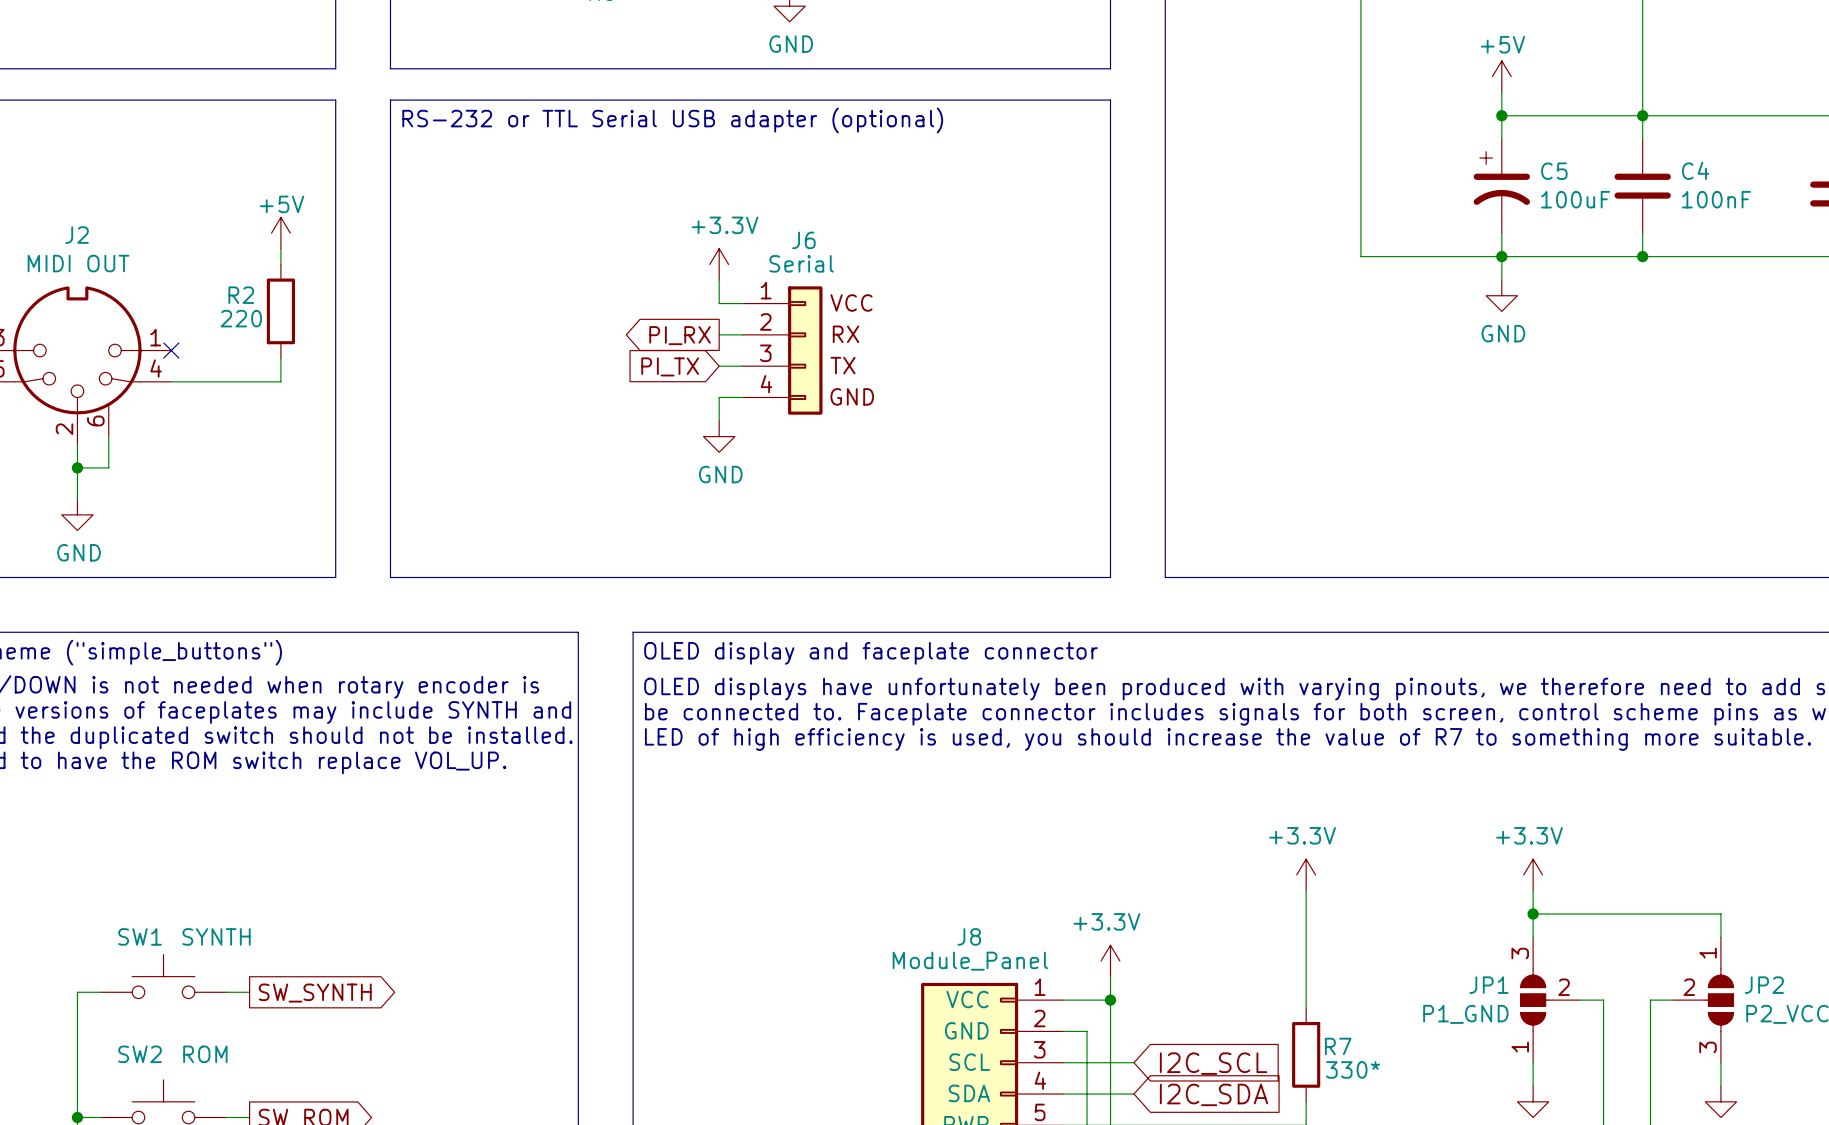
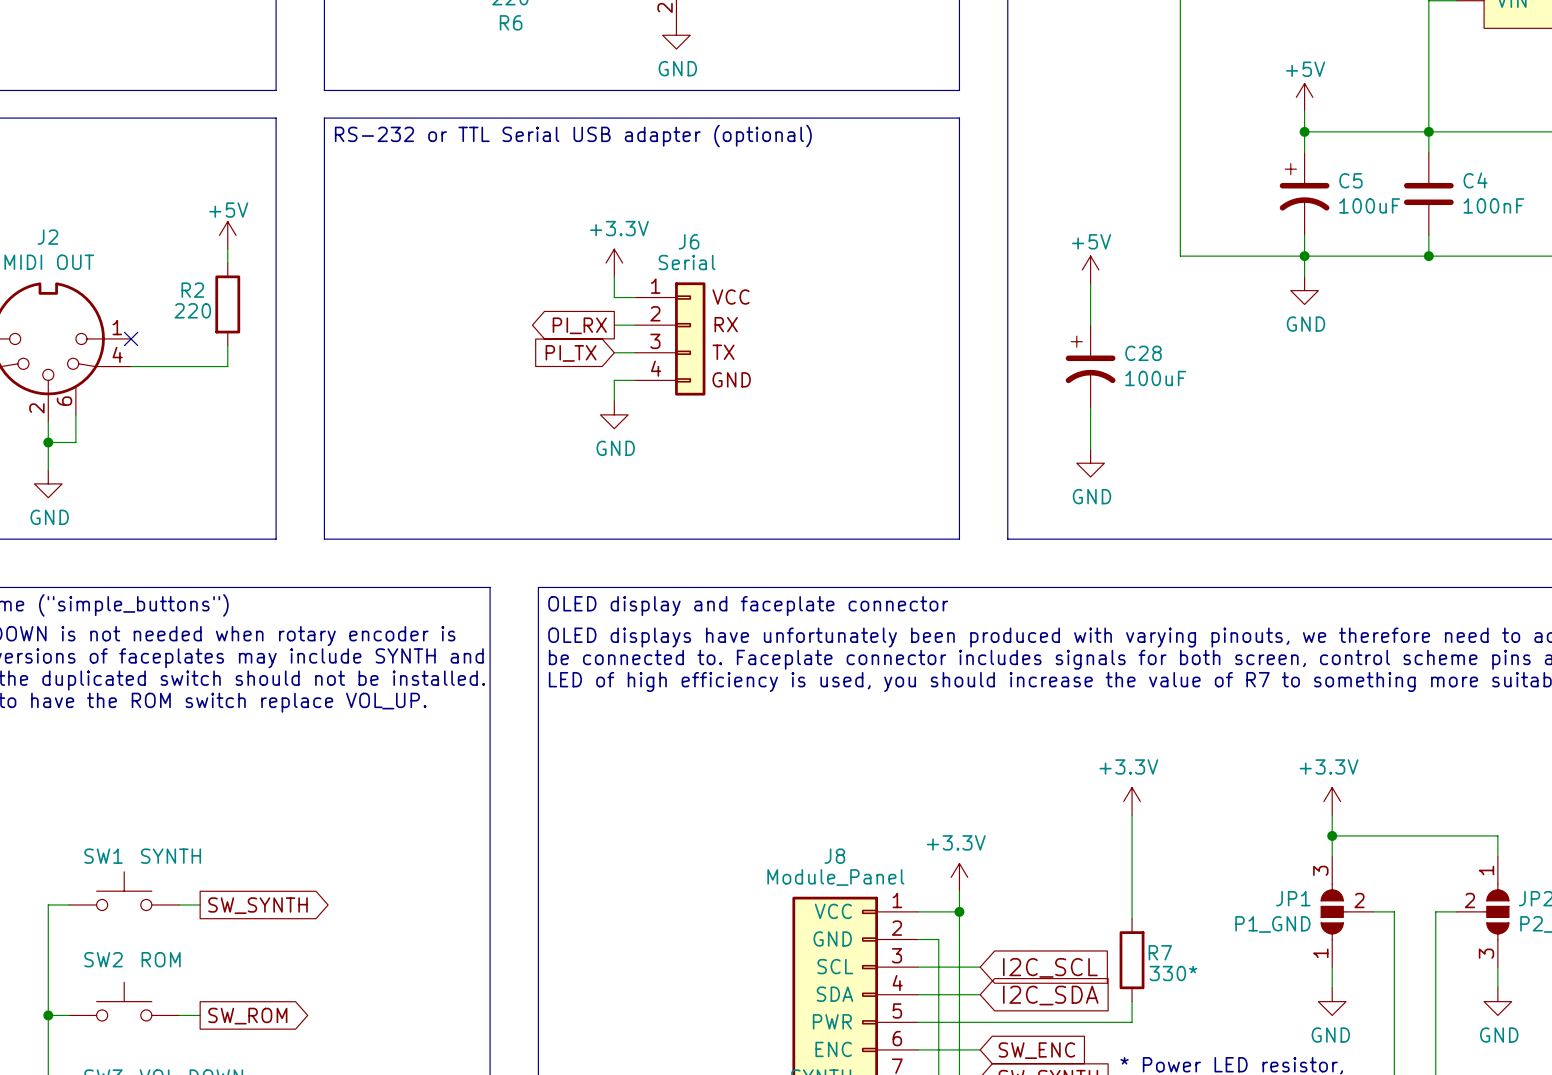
power symbol: none -> +5V (1090, 269)
wire: none -> (1090, 283) (1090, 325)
C28: none -> 100uF (1090, 366)
wire: none -> (1090, 407) (1090, 449)
power symbol: none -> GND (1090, 463)

